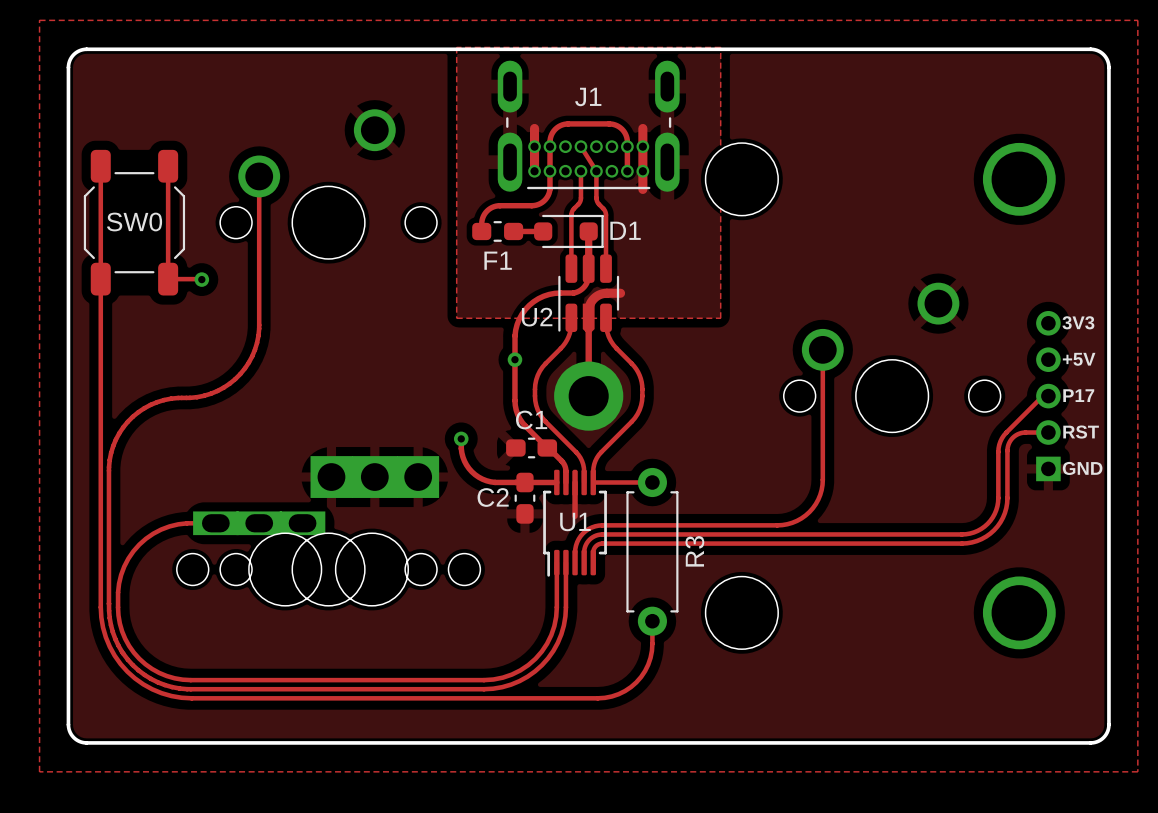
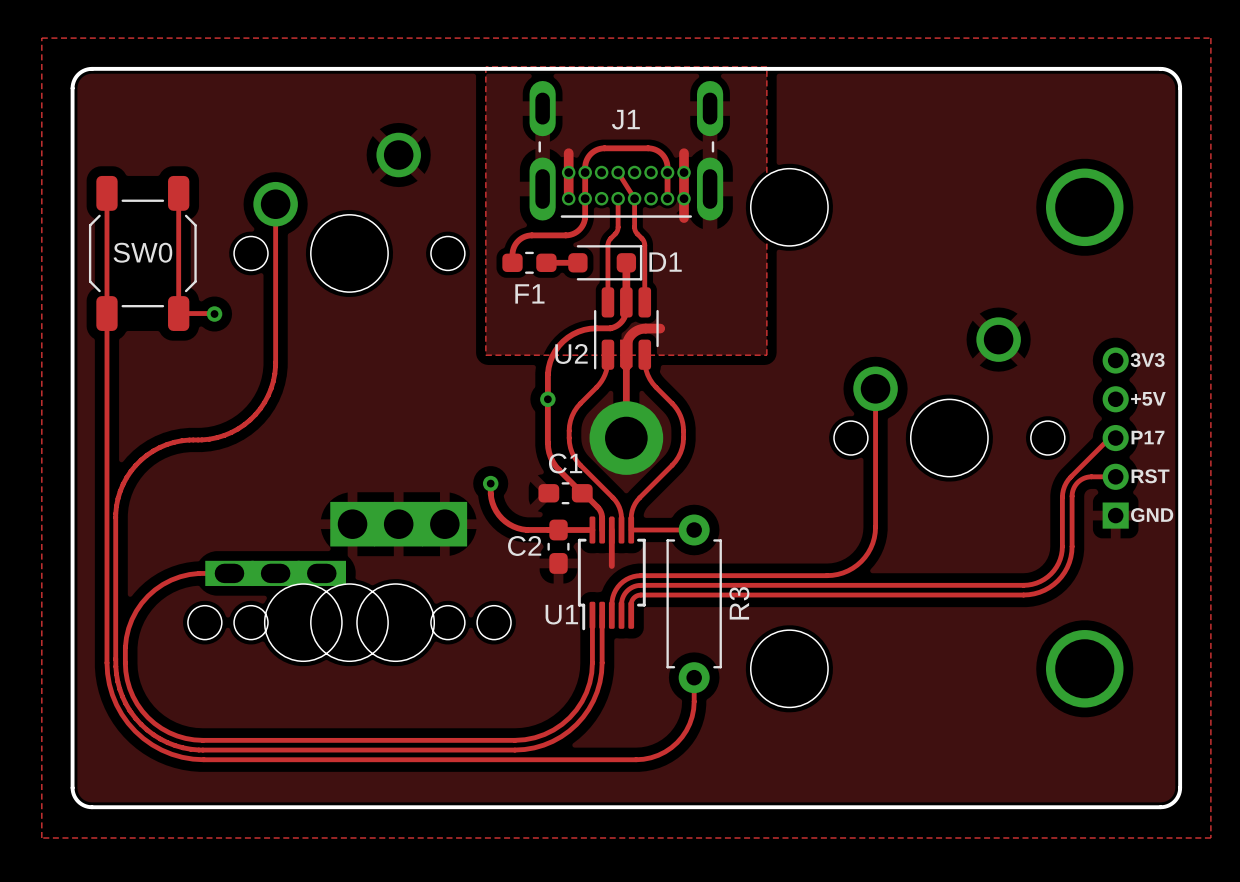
U1 name position: U1 (575, 521) -> U1 (561, 614)

